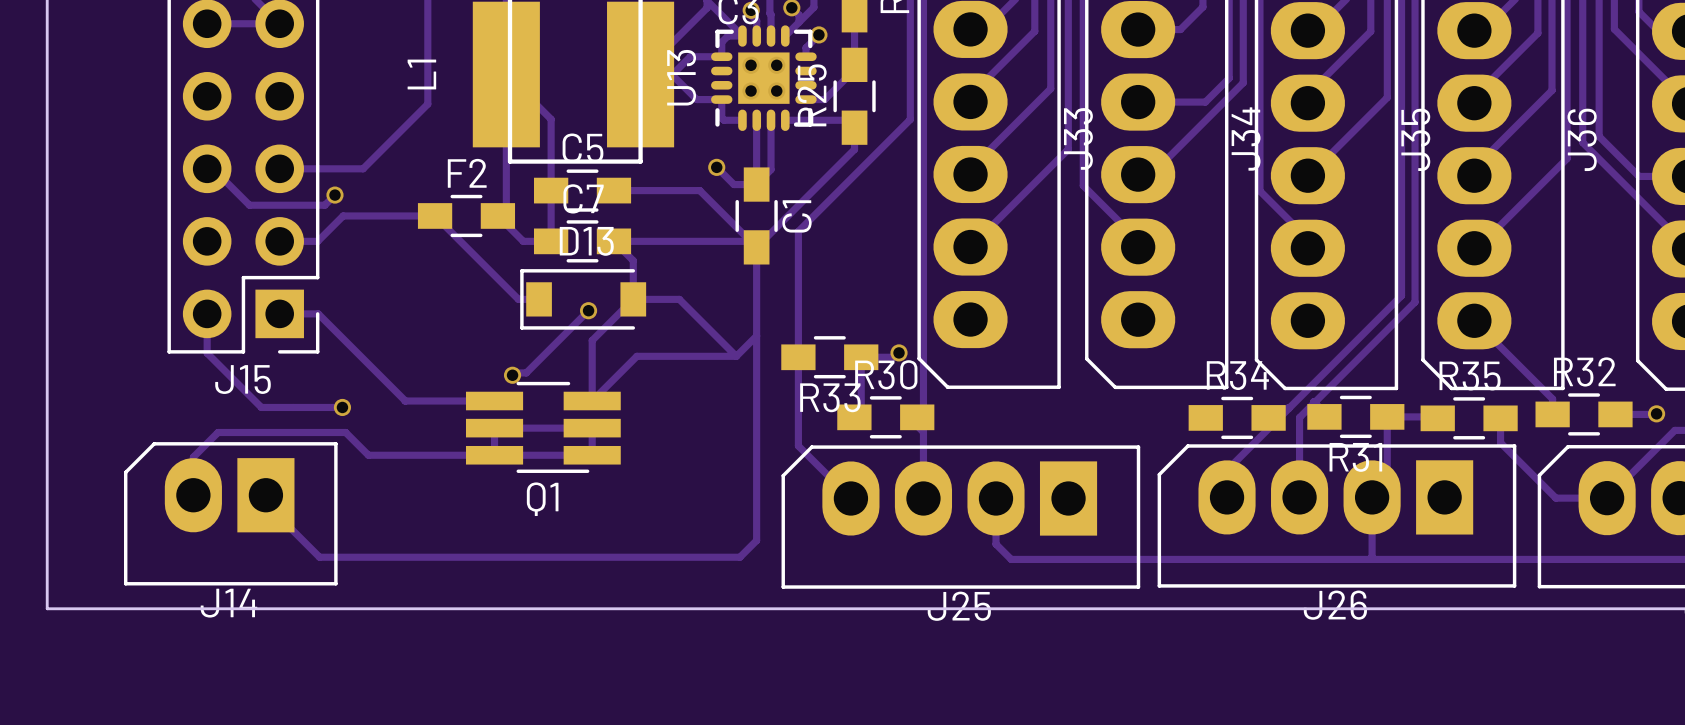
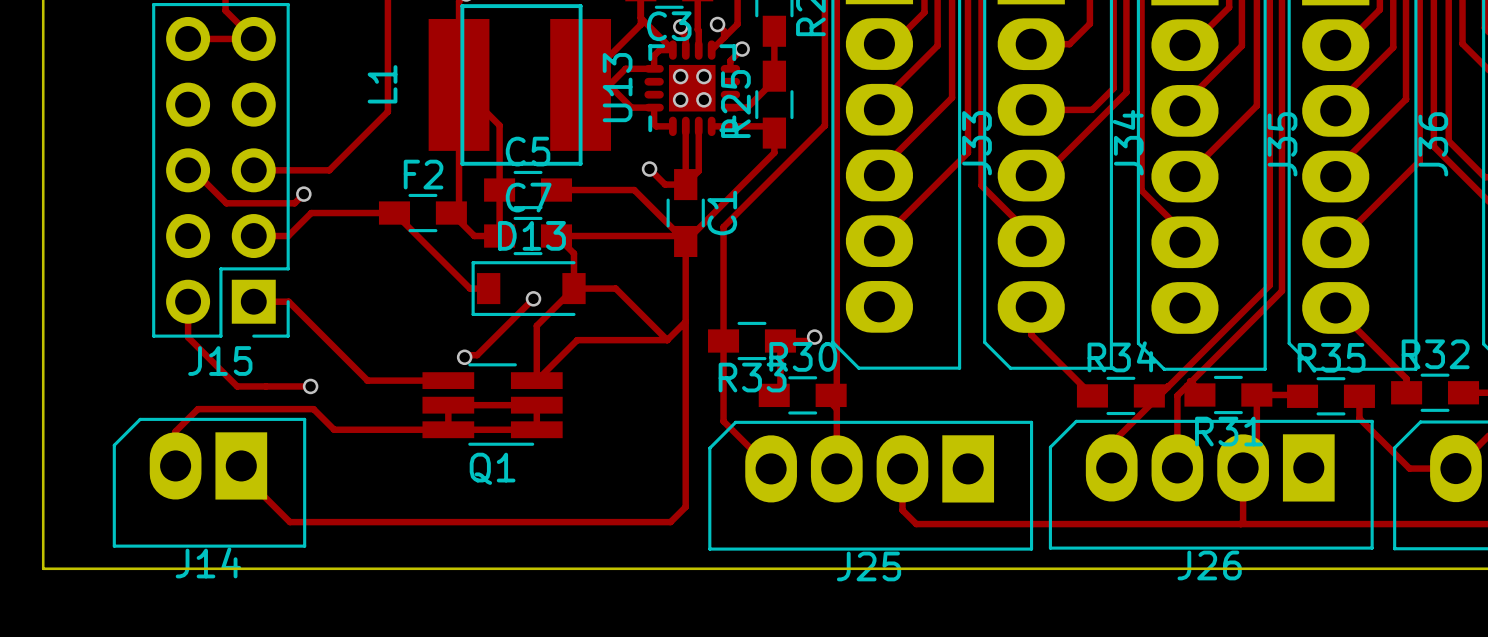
track: none -> (1031, 306) (1031, 334) (1092, 395)

